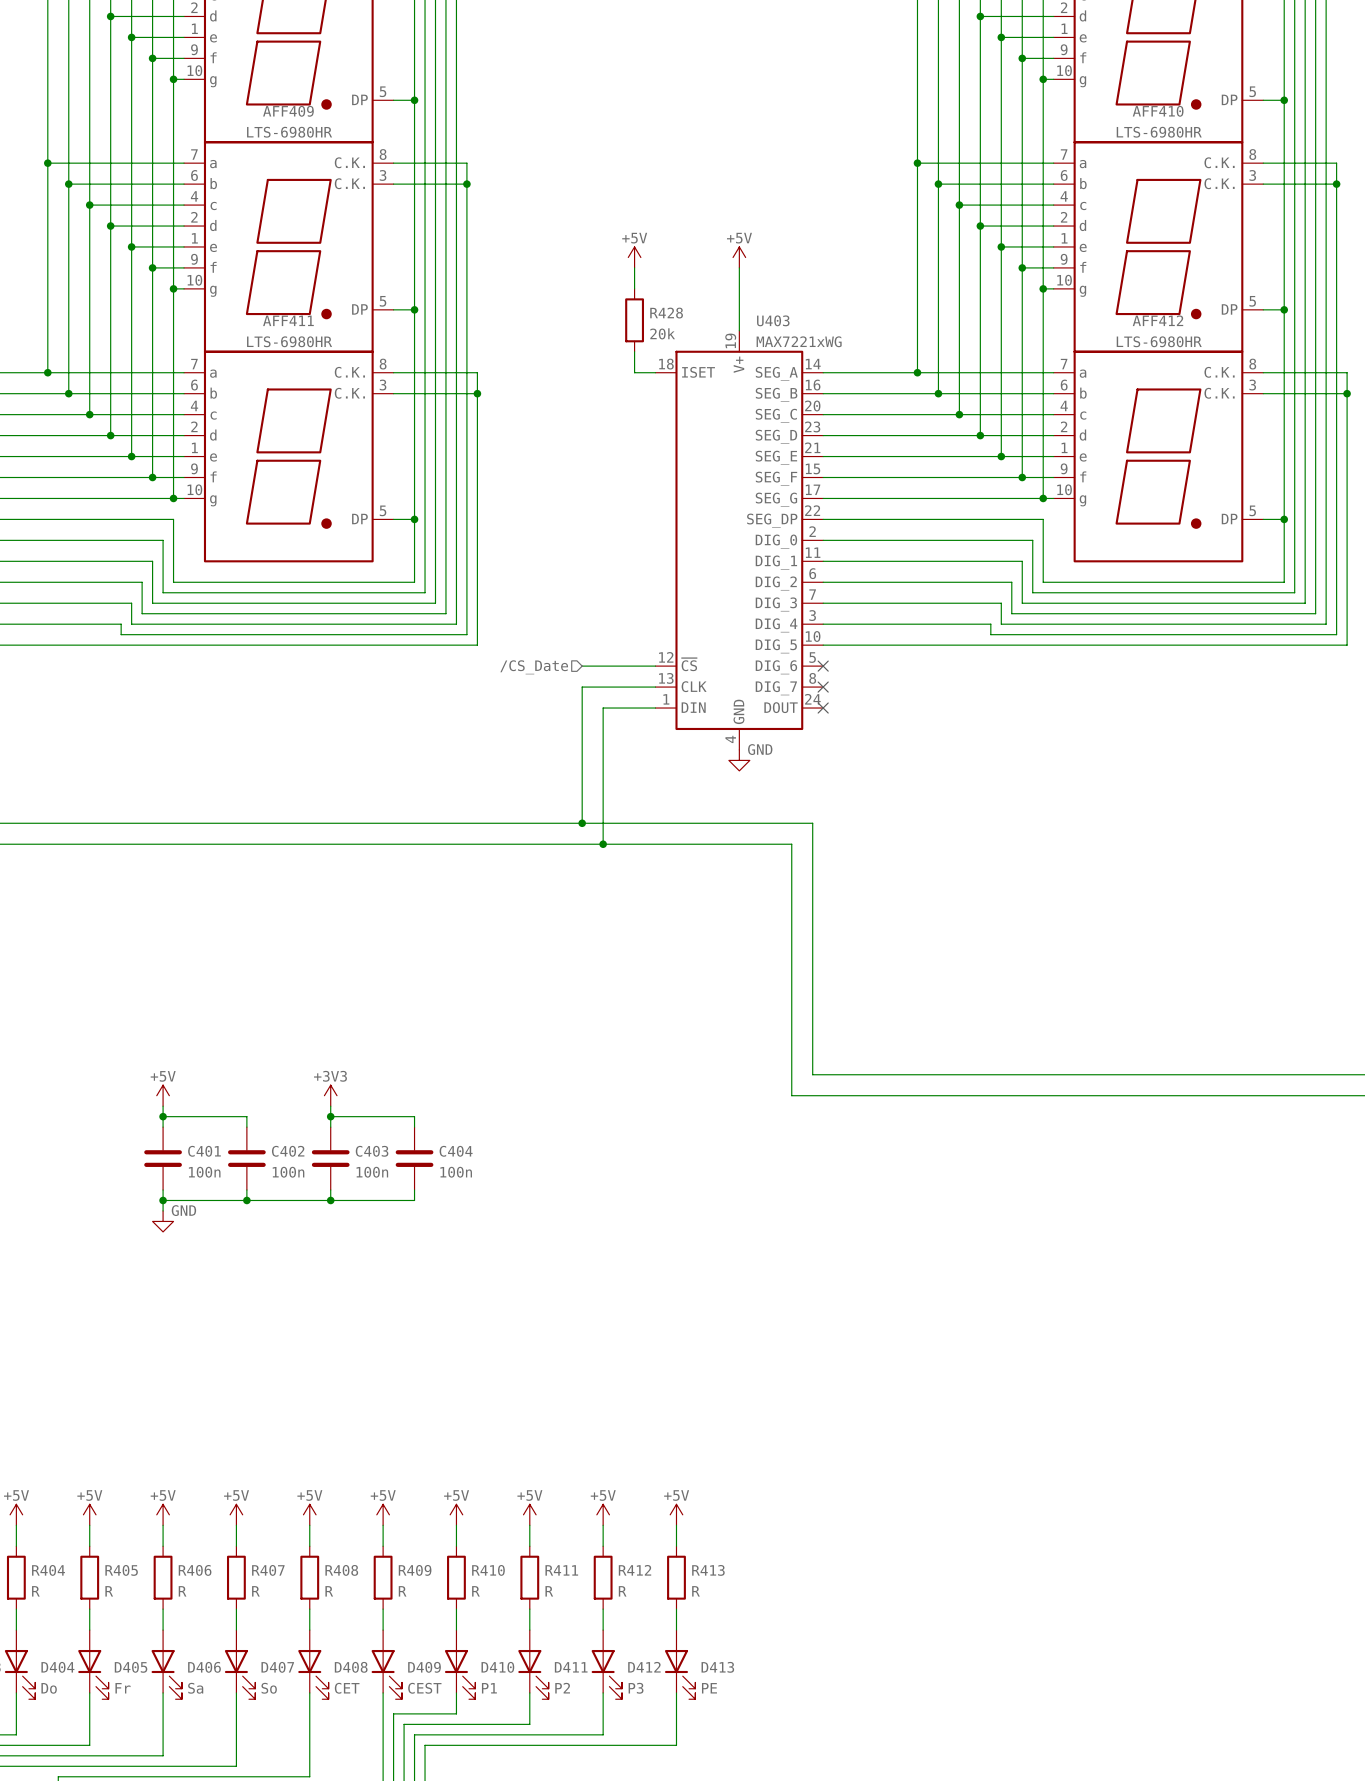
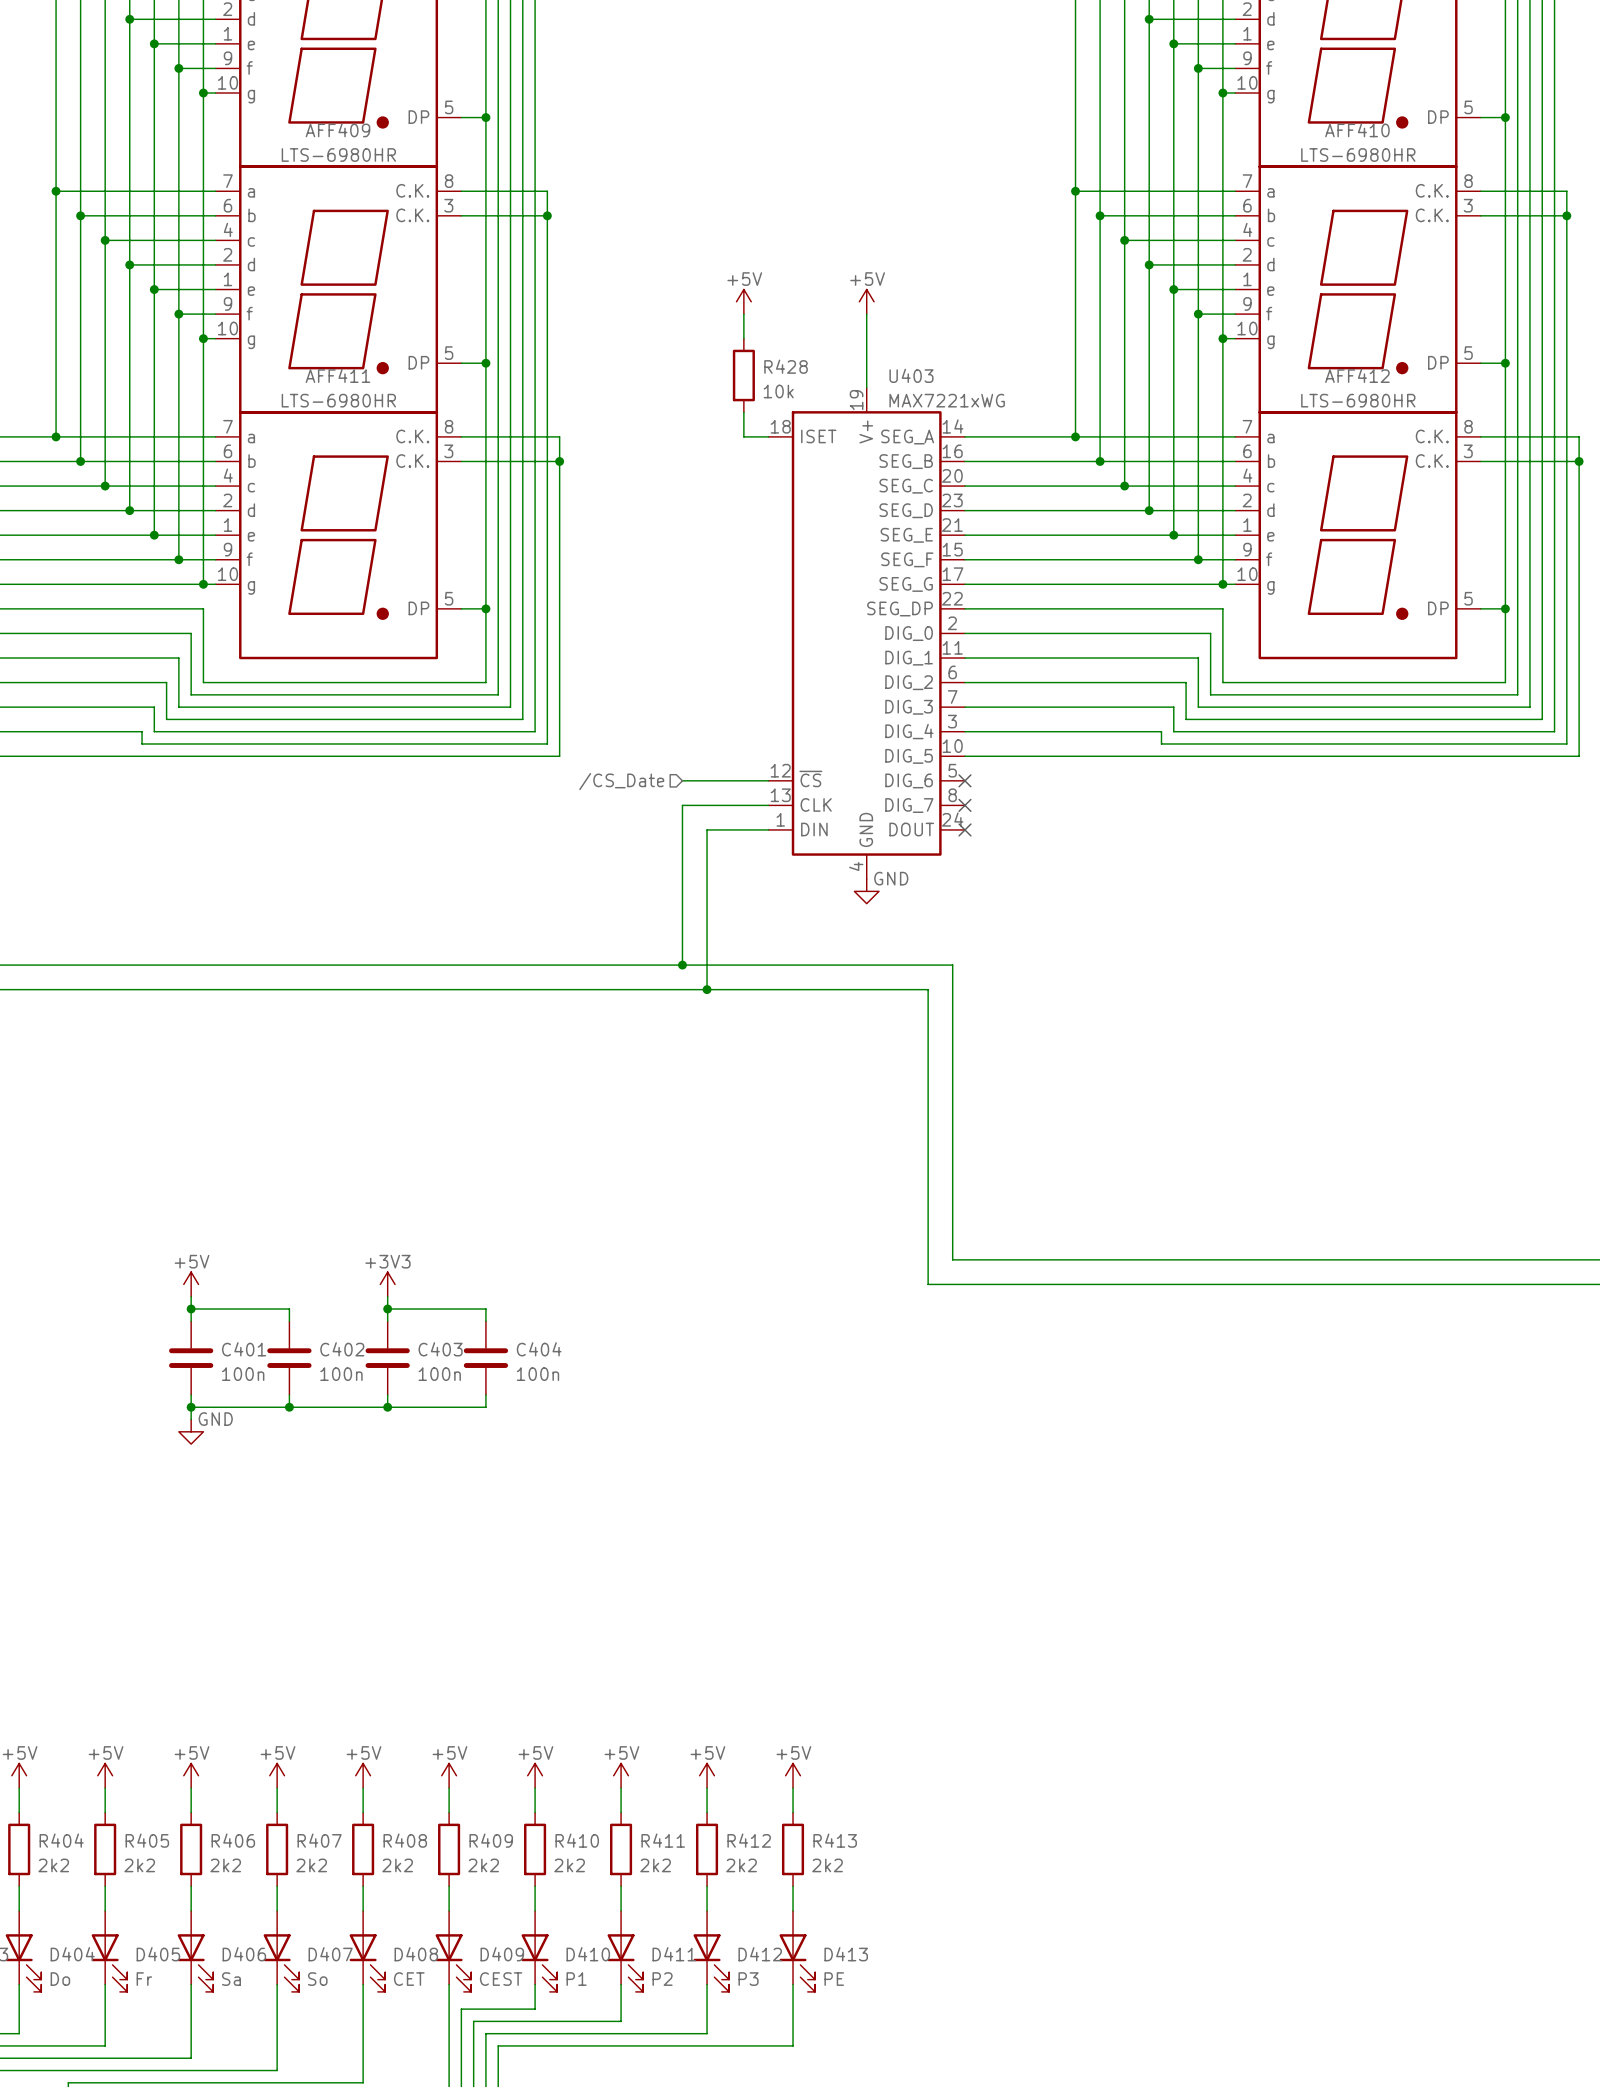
R428 value: 20k (662, 333) -> 10k (778, 391)
R404 value: R (35, 1591) -> 2k2 (53, 1865)
R405 value: R (109, 1591) -> 2k2 (139, 1865)
R406 value: R (182, 1591) -> 2k2 (225, 1865)
R407 value: R (255, 1591) -> 2k2 (311, 1865)
R408 value: R (329, 1591) -> 2k2 (397, 1865)
R409 value: R (402, 1591) -> 2k2 (483, 1865)
R410 value: R (475, 1591) -> 2k2 (569, 1865)
R411 value: R (549, 1591) -> 2k2 (655, 1865)
R412 value: R (622, 1591) -> 2k2 (741, 1865)
R413 value: R (695, 1591) -> 2k2 (827, 1865)

